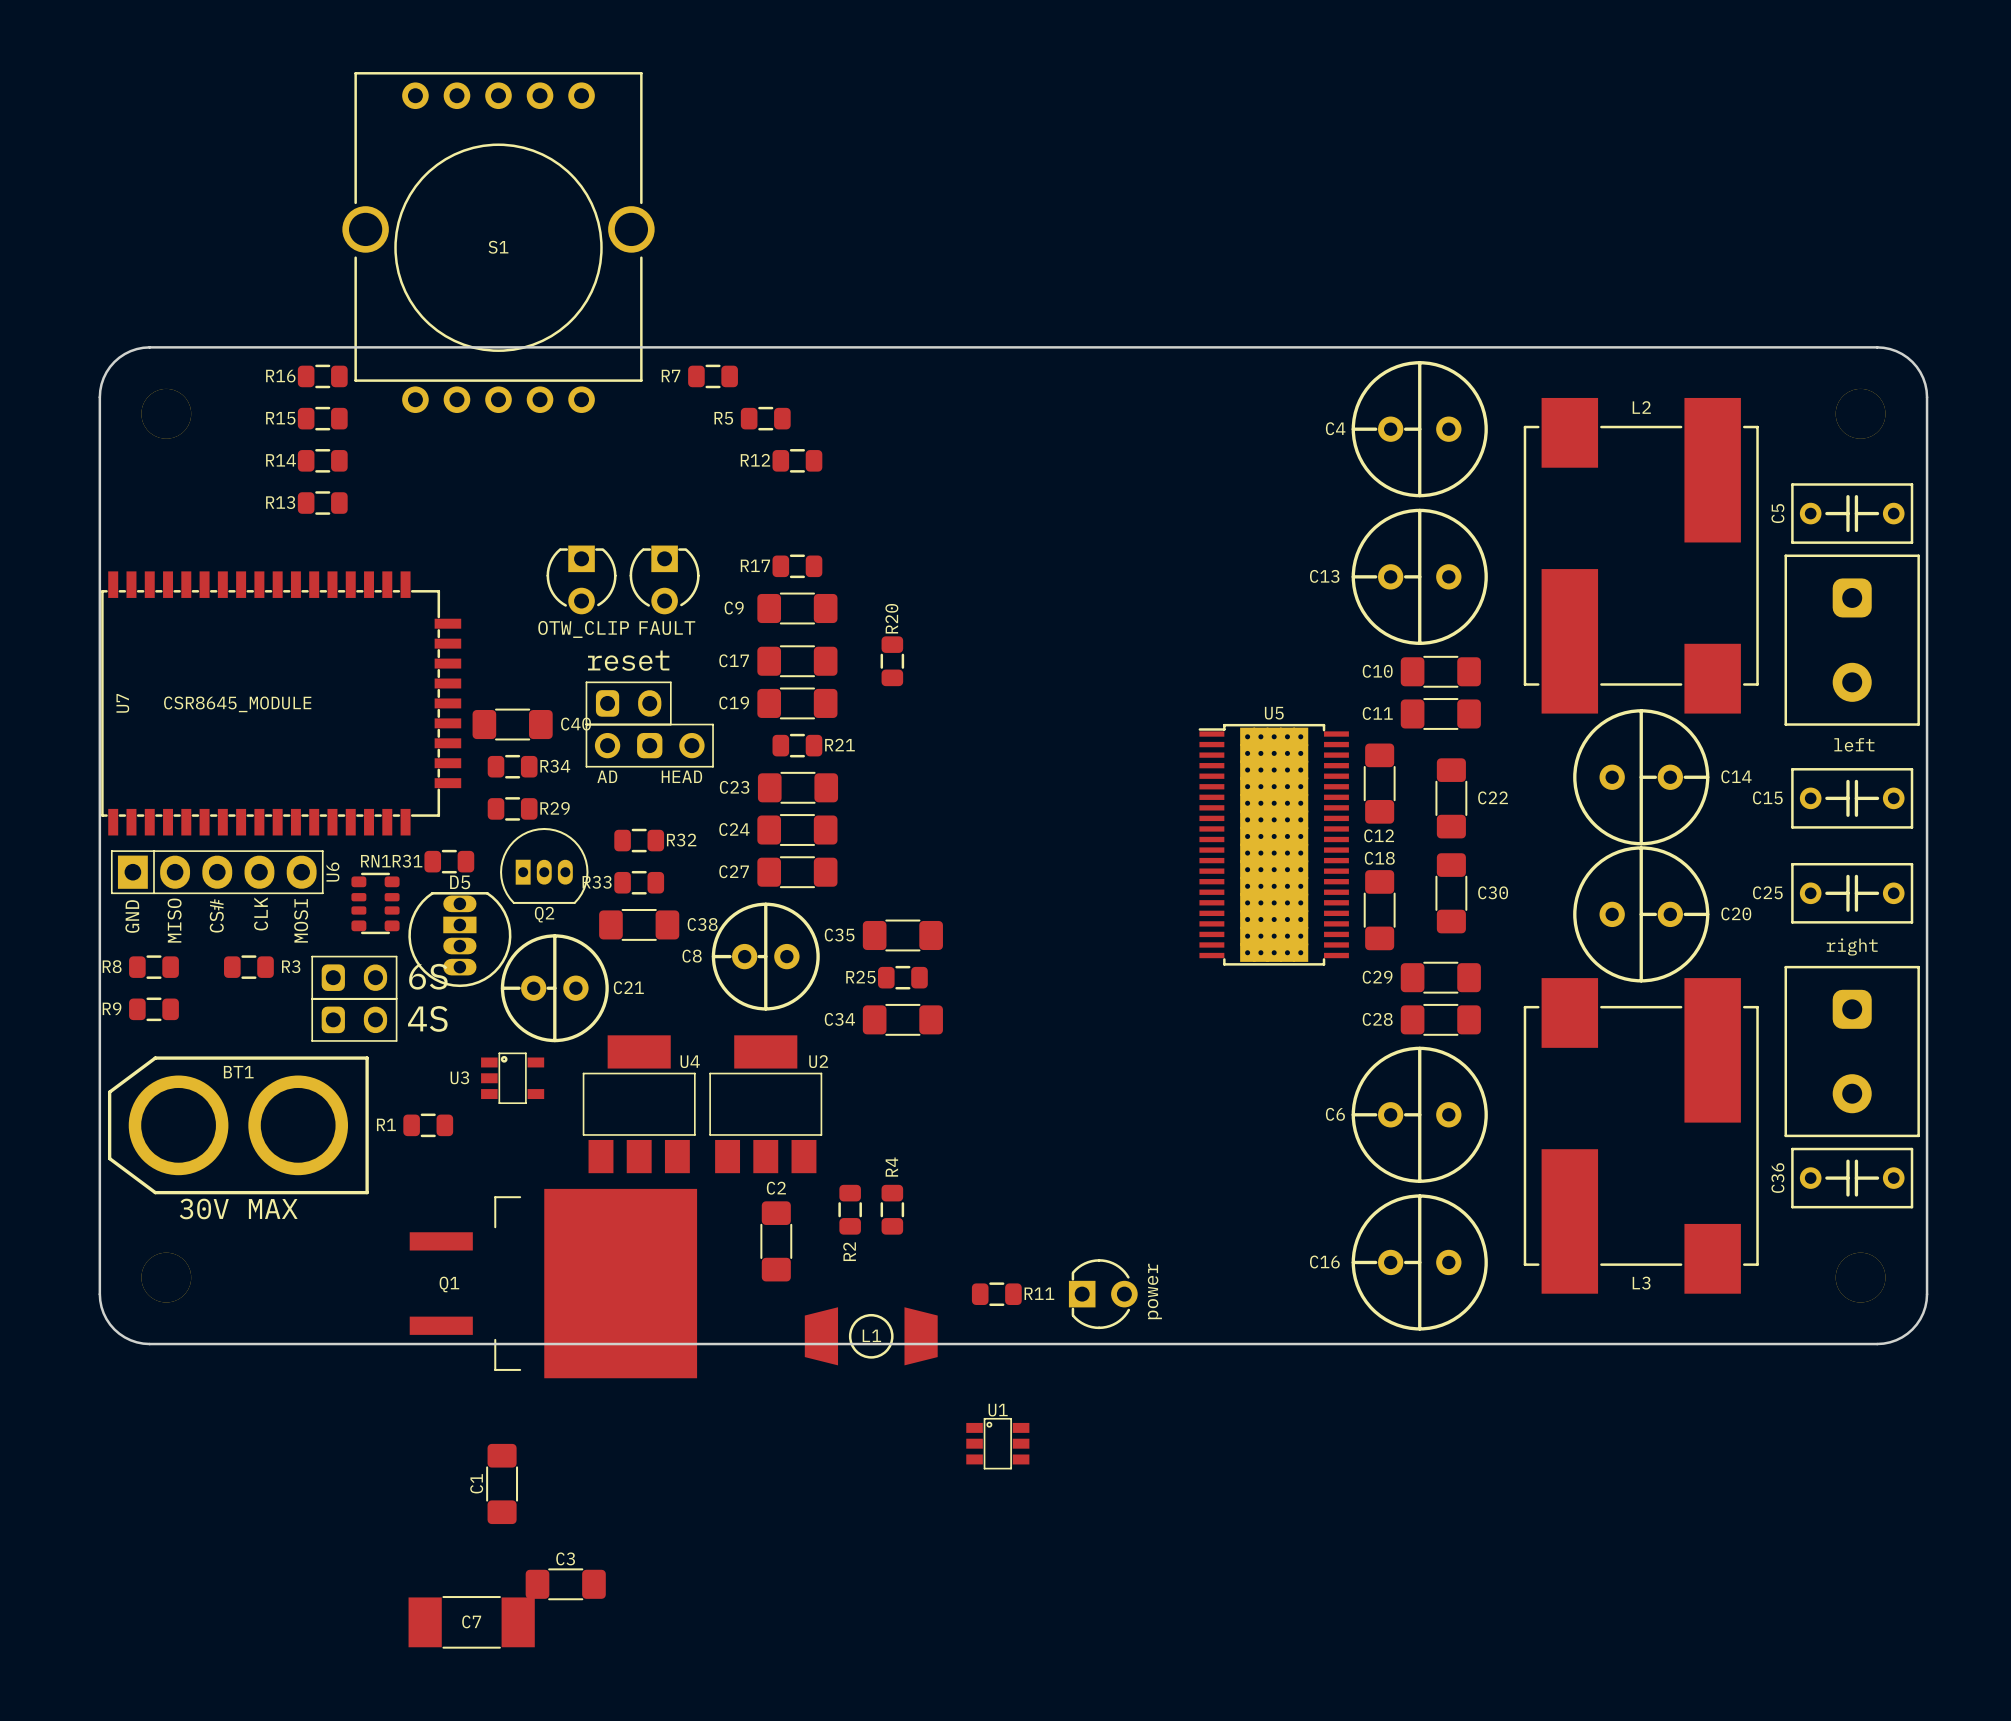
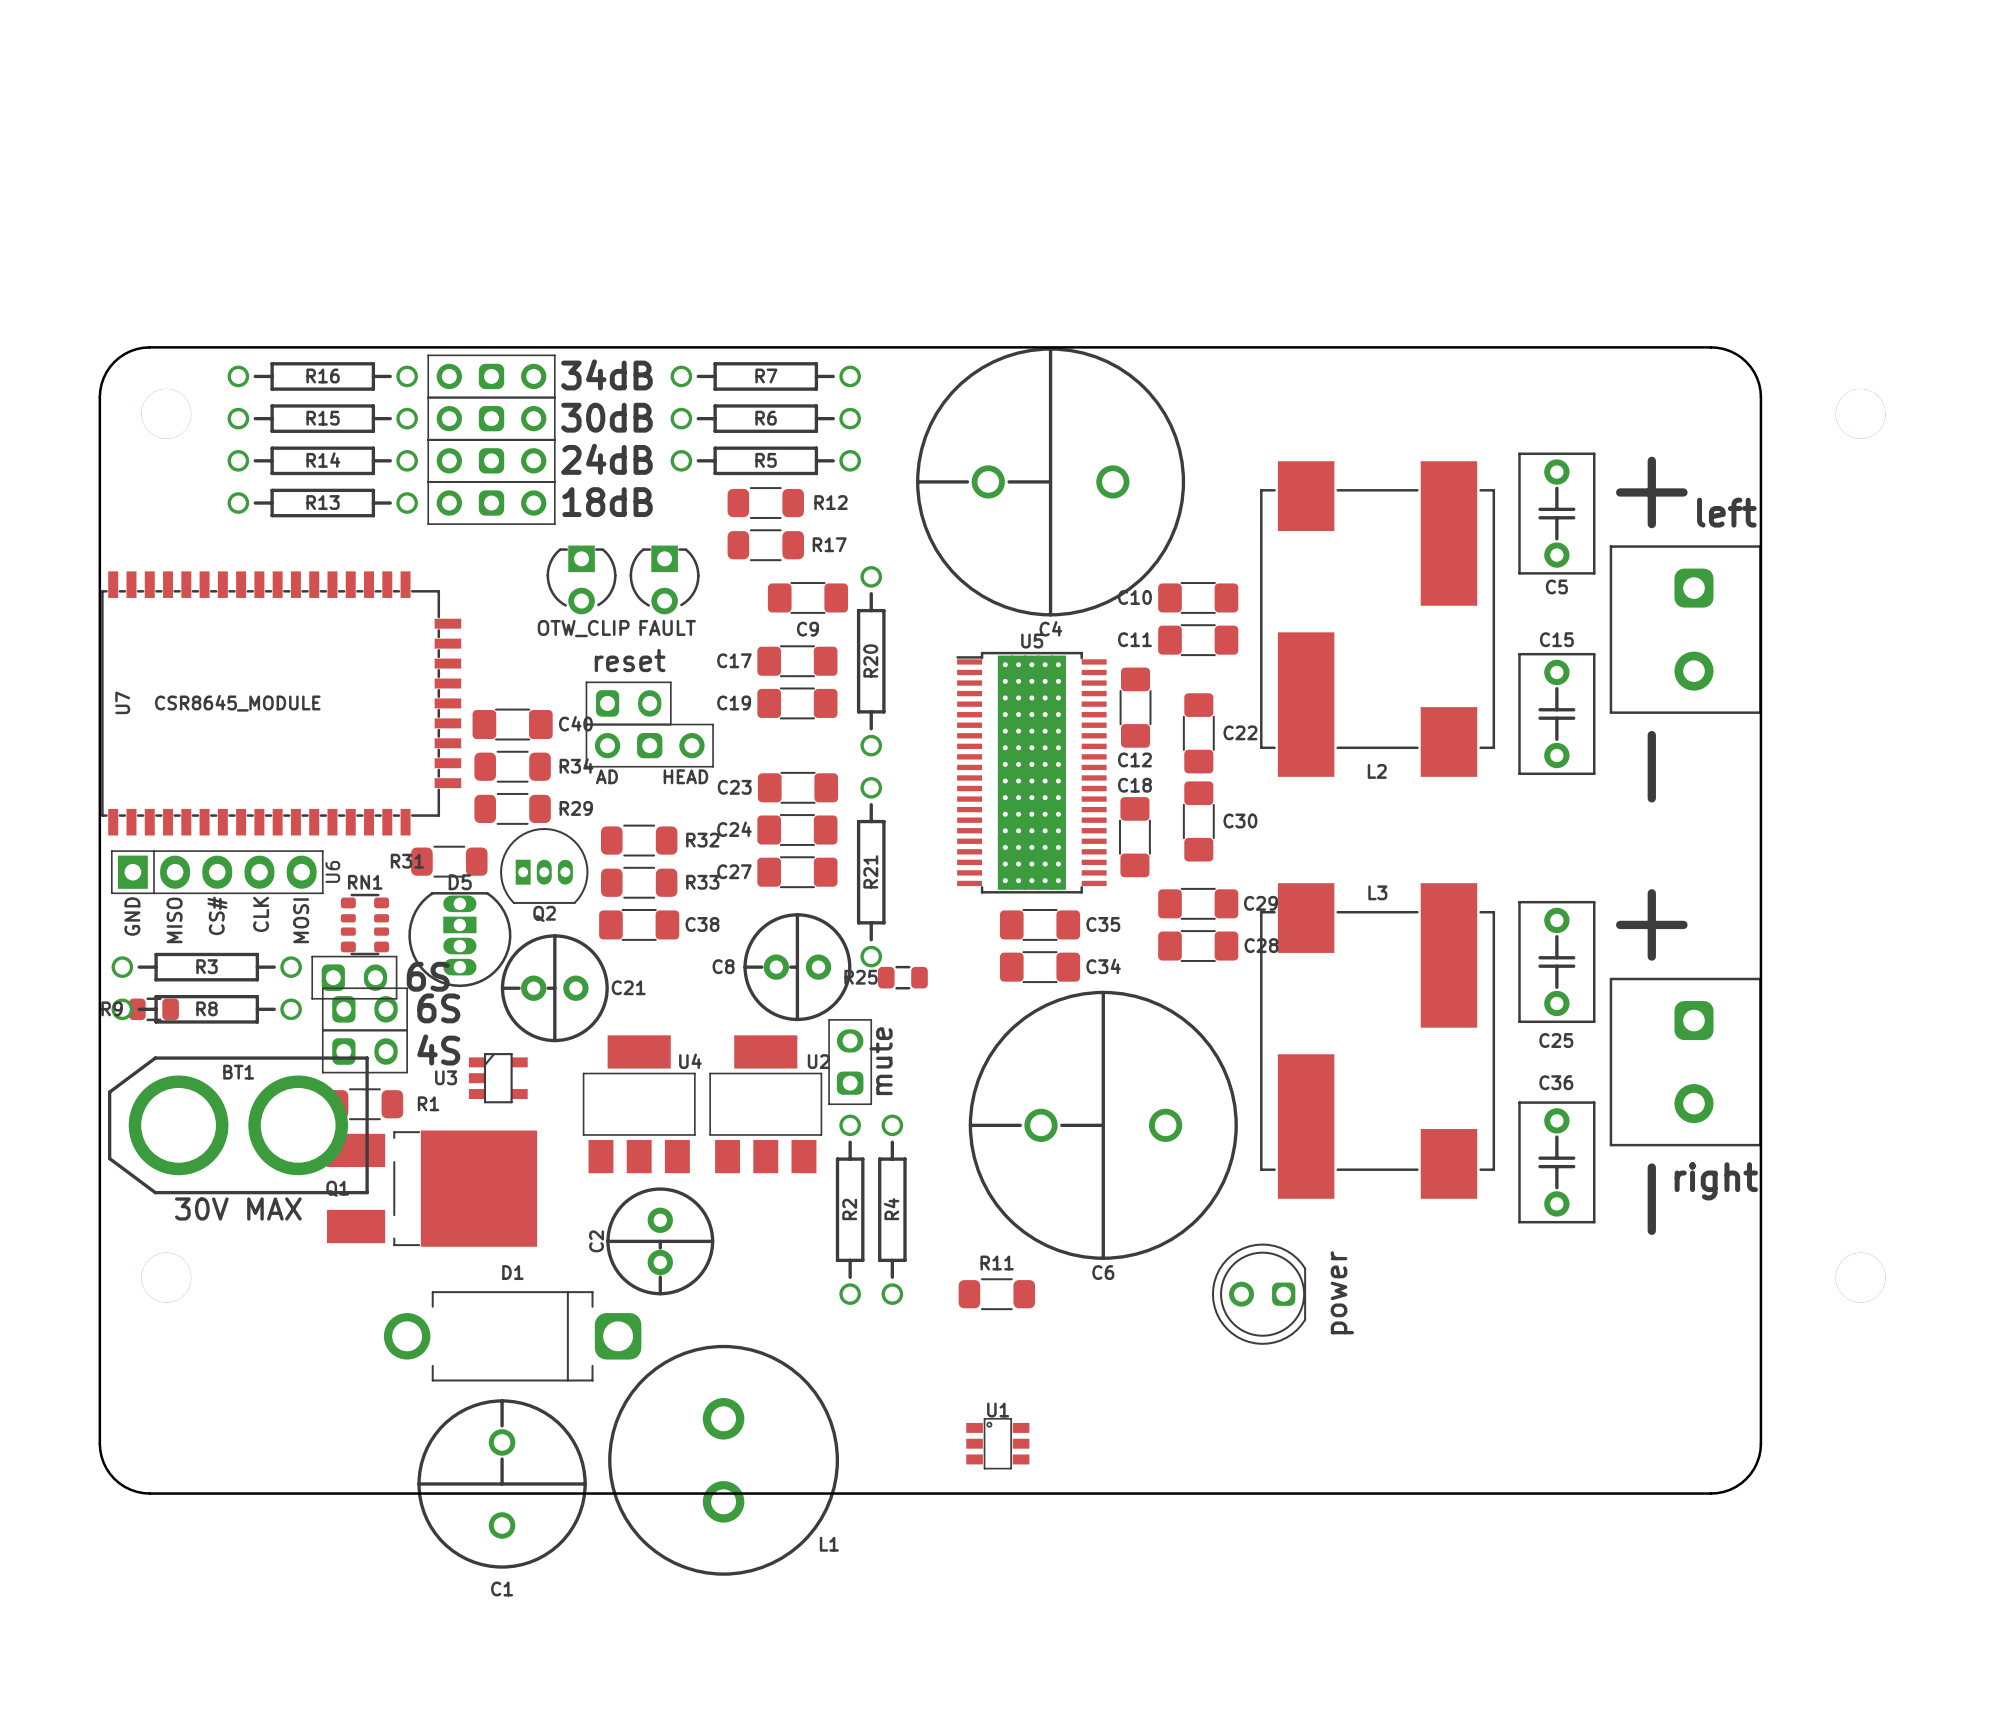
S1: (498, 242) -> none
board edge: (1711, 347) (1877, 347) (1890, 349) (1907, 357) (1916, 366) (1923, 378) (1926, 390) (1927, 1294) (1925, 1307) (1920, 1319) (1912, 1329) (1902, 1337) (1890, 1342) (1877, 1344) (149, 1344) (130, 1340) (114, 1329) (103, 1313) (99, 1294) -> (1711, 347) (1730, 351) (1746, 361) (1757, 378) (1760, 397) (1760, 1443) (1759, 1456) (1754, 1468) (1746, 1478) (1736, 1486) (1723, 1491) (1711, 1493) (143, 1493) (130, 1489) (114, 1478) (106, 1468) (101, 1456) (99, 1443) (99, 1294)
C4 footprint: [1351, 361, 1488, 498] -> [916, 347, 1186, 617]
R16 footprint: [297, 364, 348, 389] -> [227, 362, 418, 391]
R7 footprint: [688, 364, 738, 389] -> [670, 362, 861, 391]
R7 name position: R7 (671, 375) -> R7 (766, 375)
R16 name position: R16 (280, 376) -> R16 (323, 375)
part: none -> 34dB (491, 376)
R15 footprint: [297, 406, 348, 431] -> [227, 404, 418, 433]
R5 footprint: [740, 406, 791, 431] -> [670, 446, 861, 476]
L2 name position: L2 (1641, 407) -> L2 (1377, 771)
R15 name position: R15 (280, 418) -> R15 (323, 418)
part: none -> 30dB (491, 418)
R5 name position: R5 (723, 418) -> R5 (766, 460)
R6: none -> (765, 418)
C4 name position: C4 (1335, 428) -> C4 (1050, 628)
R14 footprint: [297, 449, 348, 473] -> [227, 446, 418, 476]
R12 footprint: [772, 449, 823, 473] -> [727, 487, 804, 519]
R14 name position: R14 (281, 460) -> R14 (323, 460)
part: none -> 24dB (491, 460)
R12 name position: R12 (755, 460) -> R12 (831, 502)
C5 footprint: [1791, 483, 1914, 544] -> [1518, 452, 1596, 575]
R13 footprint: [297, 491, 348, 515] -> [227, 488, 418, 518]
R13 name position: R13 (280, 502) -> R13 (323, 502)
part: none -> 18dB (491, 503)
C5 name position: C5 (1777, 513) -> C5 (1556, 586)
R17 footprint: [772, 554, 823, 579] -> [727, 529, 804, 562]
L2 position: (1641, 555) -> (1377, 619)
R17 name position: R17 (755, 565) -> R17 (829, 544)
C13: (1419, 576) -> none
C9 name position: C9 (734, 608) -> C9 (807, 629)
C9 position: (797, 608) -> (807, 597)
R20 name position: R20 (891, 618) -> R20 (870, 660)
part: none -> left (1685, 629)
R20 footprint: [880, 636, 905, 687] -> [856, 566, 886, 757]
part: left (1852, 640) -> none
C10 position: (1440, 671) -> (1198, 597)
C11 position: (1440, 713) -> (1198, 640)
R21 footprint: [772, 733, 823, 758] -> [856, 777, 886, 968]
R21 name position: R21 (839, 745) -> R21 (870, 871)
R34 footprint: [487, 754, 538, 779] -> [474, 750, 551, 783]
R34 name position: R34 (555, 766) -> R34 (576, 765)
C15 footprint: [1791, 768, 1914, 829] -> [1518, 652, 1596, 776]
C14: (1641, 777) -> none
C12 position: (1379, 783) -> (1135, 707)
R29 footprint: [487, 797, 538, 821] -> [474, 792, 551, 825]
C15 name position: C15 (1767, 797) -> C15 (1556, 639)
C22 position: (1451, 798) -> (1198, 733)
R29 name position: R29 (555, 808) -> R29 (576, 808)
R32 footprint: [614, 828, 665, 853] -> [600, 824, 678, 857]
R32 name position: R32 (681, 840) -> R32 (702, 840)
U5 position: (1273, 844) -> (1031, 772)
R31 footprint: [424, 849, 475, 874] -> [411, 845, 488, 878]
C25 footprint: [1791, 862, 1914, 924] -> [1518, 900, 1596, 1024]
R33 footprint: [614, 870, 665, 895] -> [600, 866, 678, 899]
R33 name position: R33 (597, 882) -> R33 (702, 882)
C25 name position: C25 (1767, 892) -> C25 (1556, 1040)
C30 position: (1451, 893) -> (1198, 821)
RN1 position: (375, 903) -> (364, 924)
C18 position: (1379, 910) -> (1134, 837)
C20: (1641, 914) -> none
C35 name position: C35 (839, 935) -> C35 (1103, 924)
C35 position: (902, 935) -> (1040, 924)
R8 footprint: [129, 955, 179, 979] -> [111, 995, 302, 1024]
R3 footprint: [224, 955, 274, 979] -> [111, 952, 302, 982]
C8 position: (765, 956) -> (797, 967)
R8 name position: R8 (112, 966) -> R8 (207, 1008)
R3 name position: R3 (291, 966) -> R3 (207, 966)
C29 name position: C29 (1377, 977) -> C29 (1260, 903)
C29 position: (1440, 977) -> (1198, 903)
part value: 4S (427, 1018) -> 6S (438, 1008)
part position: (354, 1019) -> (364, 1009)
C34 name position: C34 (839, 1019) -> C34 (1103, 966)
C34 position: (902, 1019) -> (1040, 967)
C28 name position: C28 (1377, 1019) -> C28 (1261, 945)
C28 position: (1440, 1019) -> (1198, 946)
C6 footprint: [1351, 1046, 1488, 1183] -> [968, 990, 1238, 1260]
part: none -> 4S (364, 1051)
part: right (1852, 1051) -> none
U3 footprint: [481, 1052, 545, 1105] -> [468, 1053, 528, 1104]
part: none -> mute (850, 1062)
part: none -> right (1685, 1062)
U3 name position: U3 (459, 1077) -> U3 (446, 1077)
R1 footprint: [403, 1113, 454, 1138] -> [326, 1088, 404, 1121]
C6 name position: C6 (1335, 1114) -> C6 (1103, 1272)
R1 name position: R1 (386, 1124) -> R1 (428, 1103)
L3 position: (1641, 1135) -> (1377, 1040)
C36 footprint: [1791, 1147, 1914, 1209] -> [1518, 1101, 1596, 1224]
R4 name position: R4 (891, 1167) -> R4 (891, 1209)
C36 name position: C36 (1777, 1178) -> C36 (1556, 1082)
R2 footprint: [838, 1184, 862, 1235] -> [835, 1114, 865, 1305]
R4 footprint: [880, 1184, 905, 1235] -> [878, 1114, 907, 1305]
Q1 footprint: [409, 1188, 698, 1379] -> [326, 1130, 538, 1247]
C2 name position: C2 (776, 1188) -> C2 (596, 1241)
C2 footprint: [760, 1201, 793, 1282] -> [606, 1187, 715, 1296]
R2 name position: R2 (849, 1251) -> R2 (849, 1209)
C16: (1419, 1262) -> none
R11 footprint: [971, 1282, 1022, 1306] -> [958, 1278, 1036, 1311]
L3 name position: L3 (1641, 1283) -> L3 (1377, 892)
R11 name position: R11 (1039, 1293) -> R11 (997, 1263)
part: power (1103, 1294) -> none
part: none -> power (1259, 1294)
L1 footprint: [804, 1307, 938, 1366] -> [608, 1344, 840, 1576]
L1 name position: L1 (871, 1335) -> L1 (829, 1544)
D1: none -> (512, 1336)
C1 footprint: [486, 1443, 519, 1525] -> [417, 1399, 587, 1569]
C1 name position: C1 (476, 1483) -> C1 (502, 1588)
C3: (565, 1584) -> none
C7: (471, 1622) -> none

